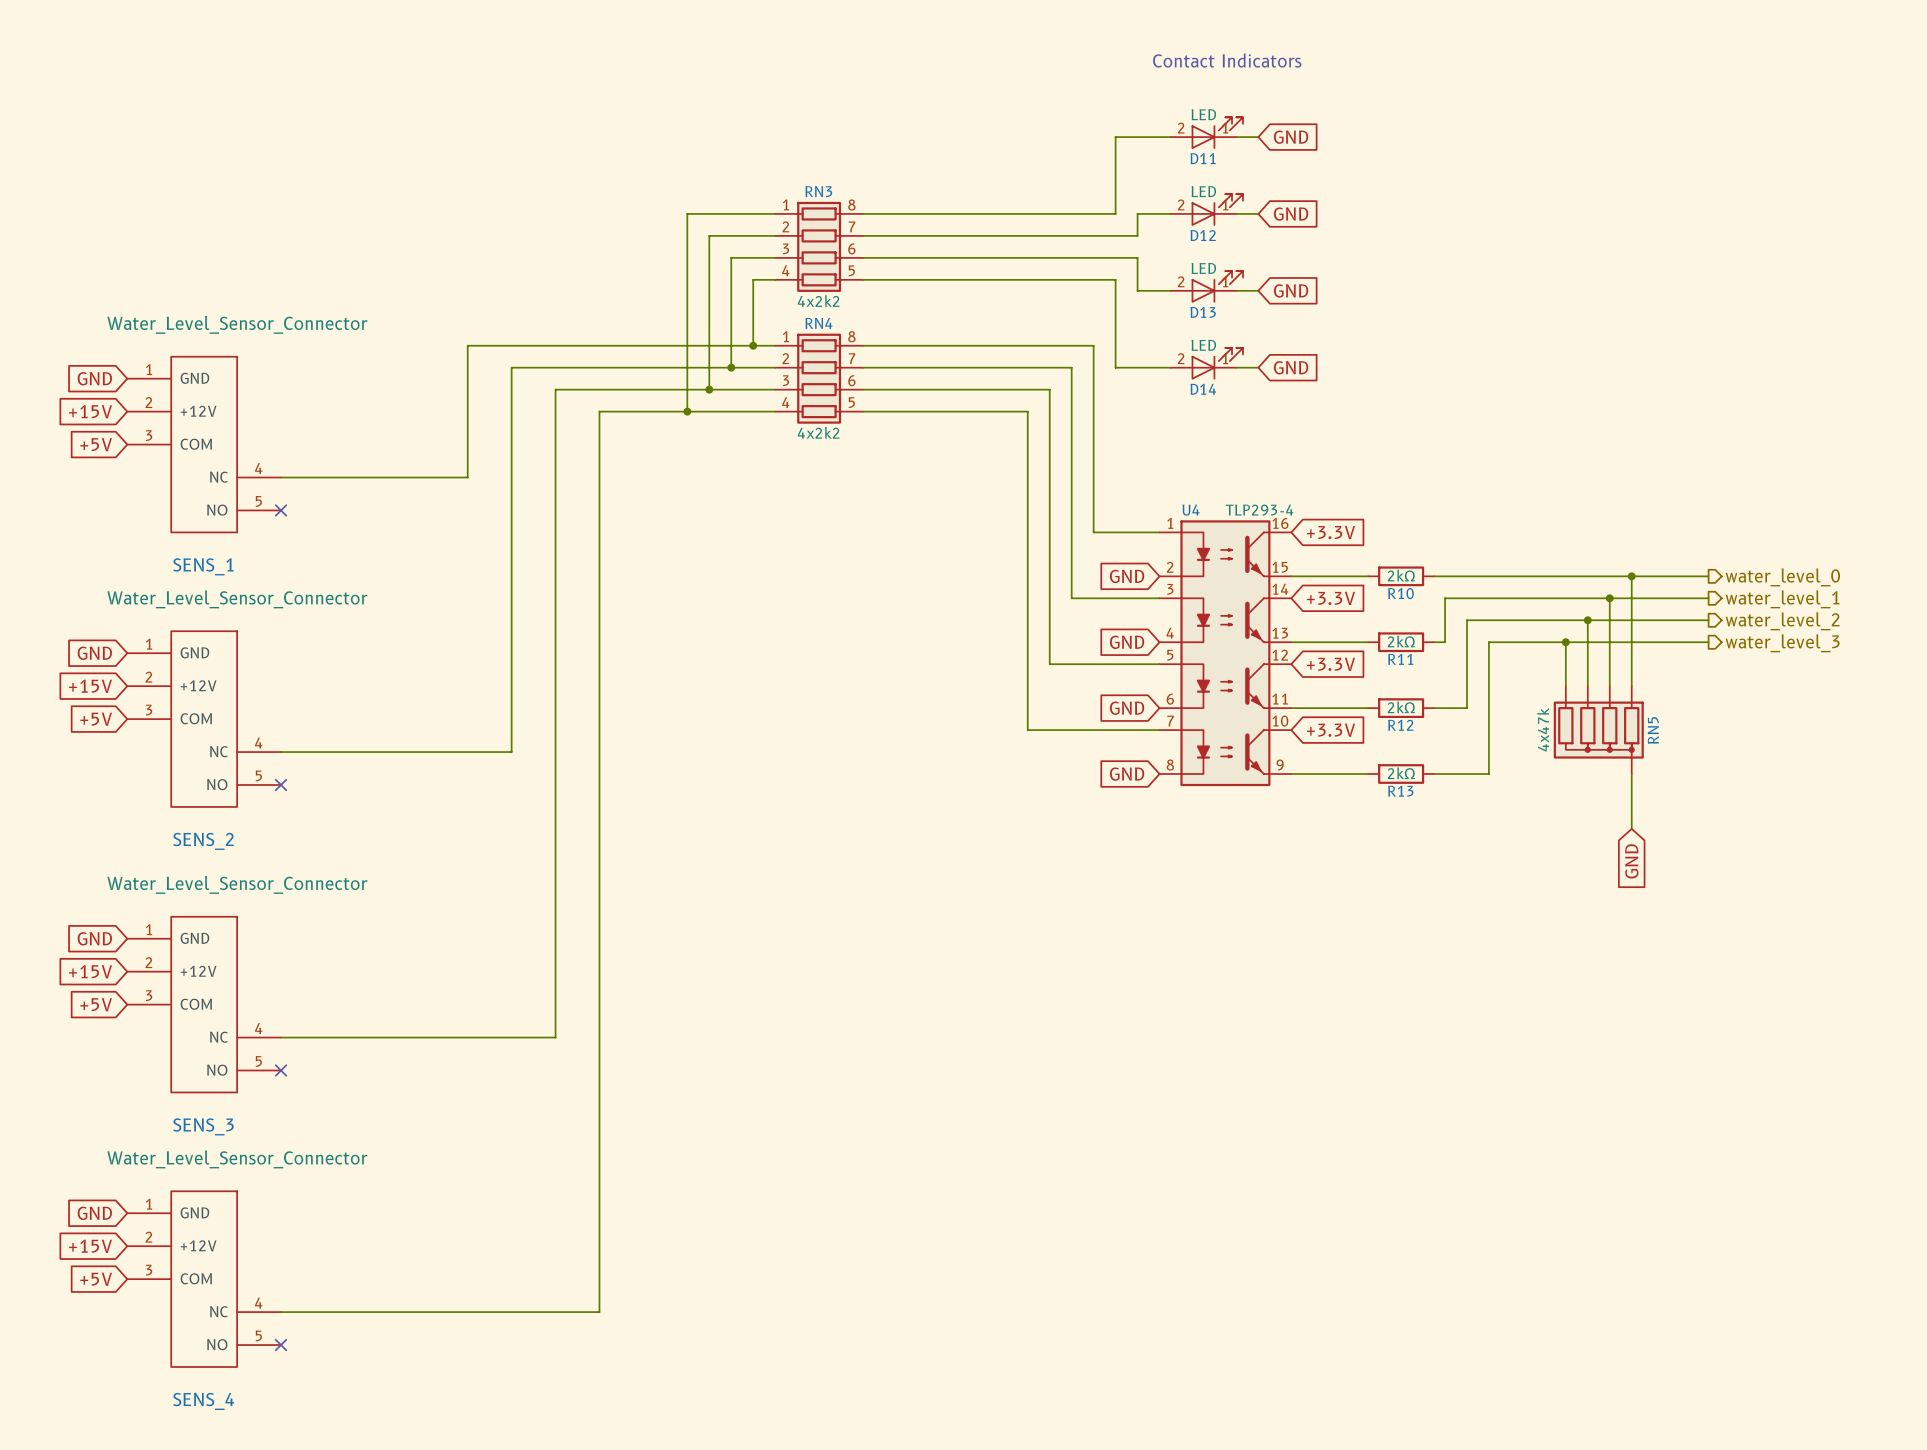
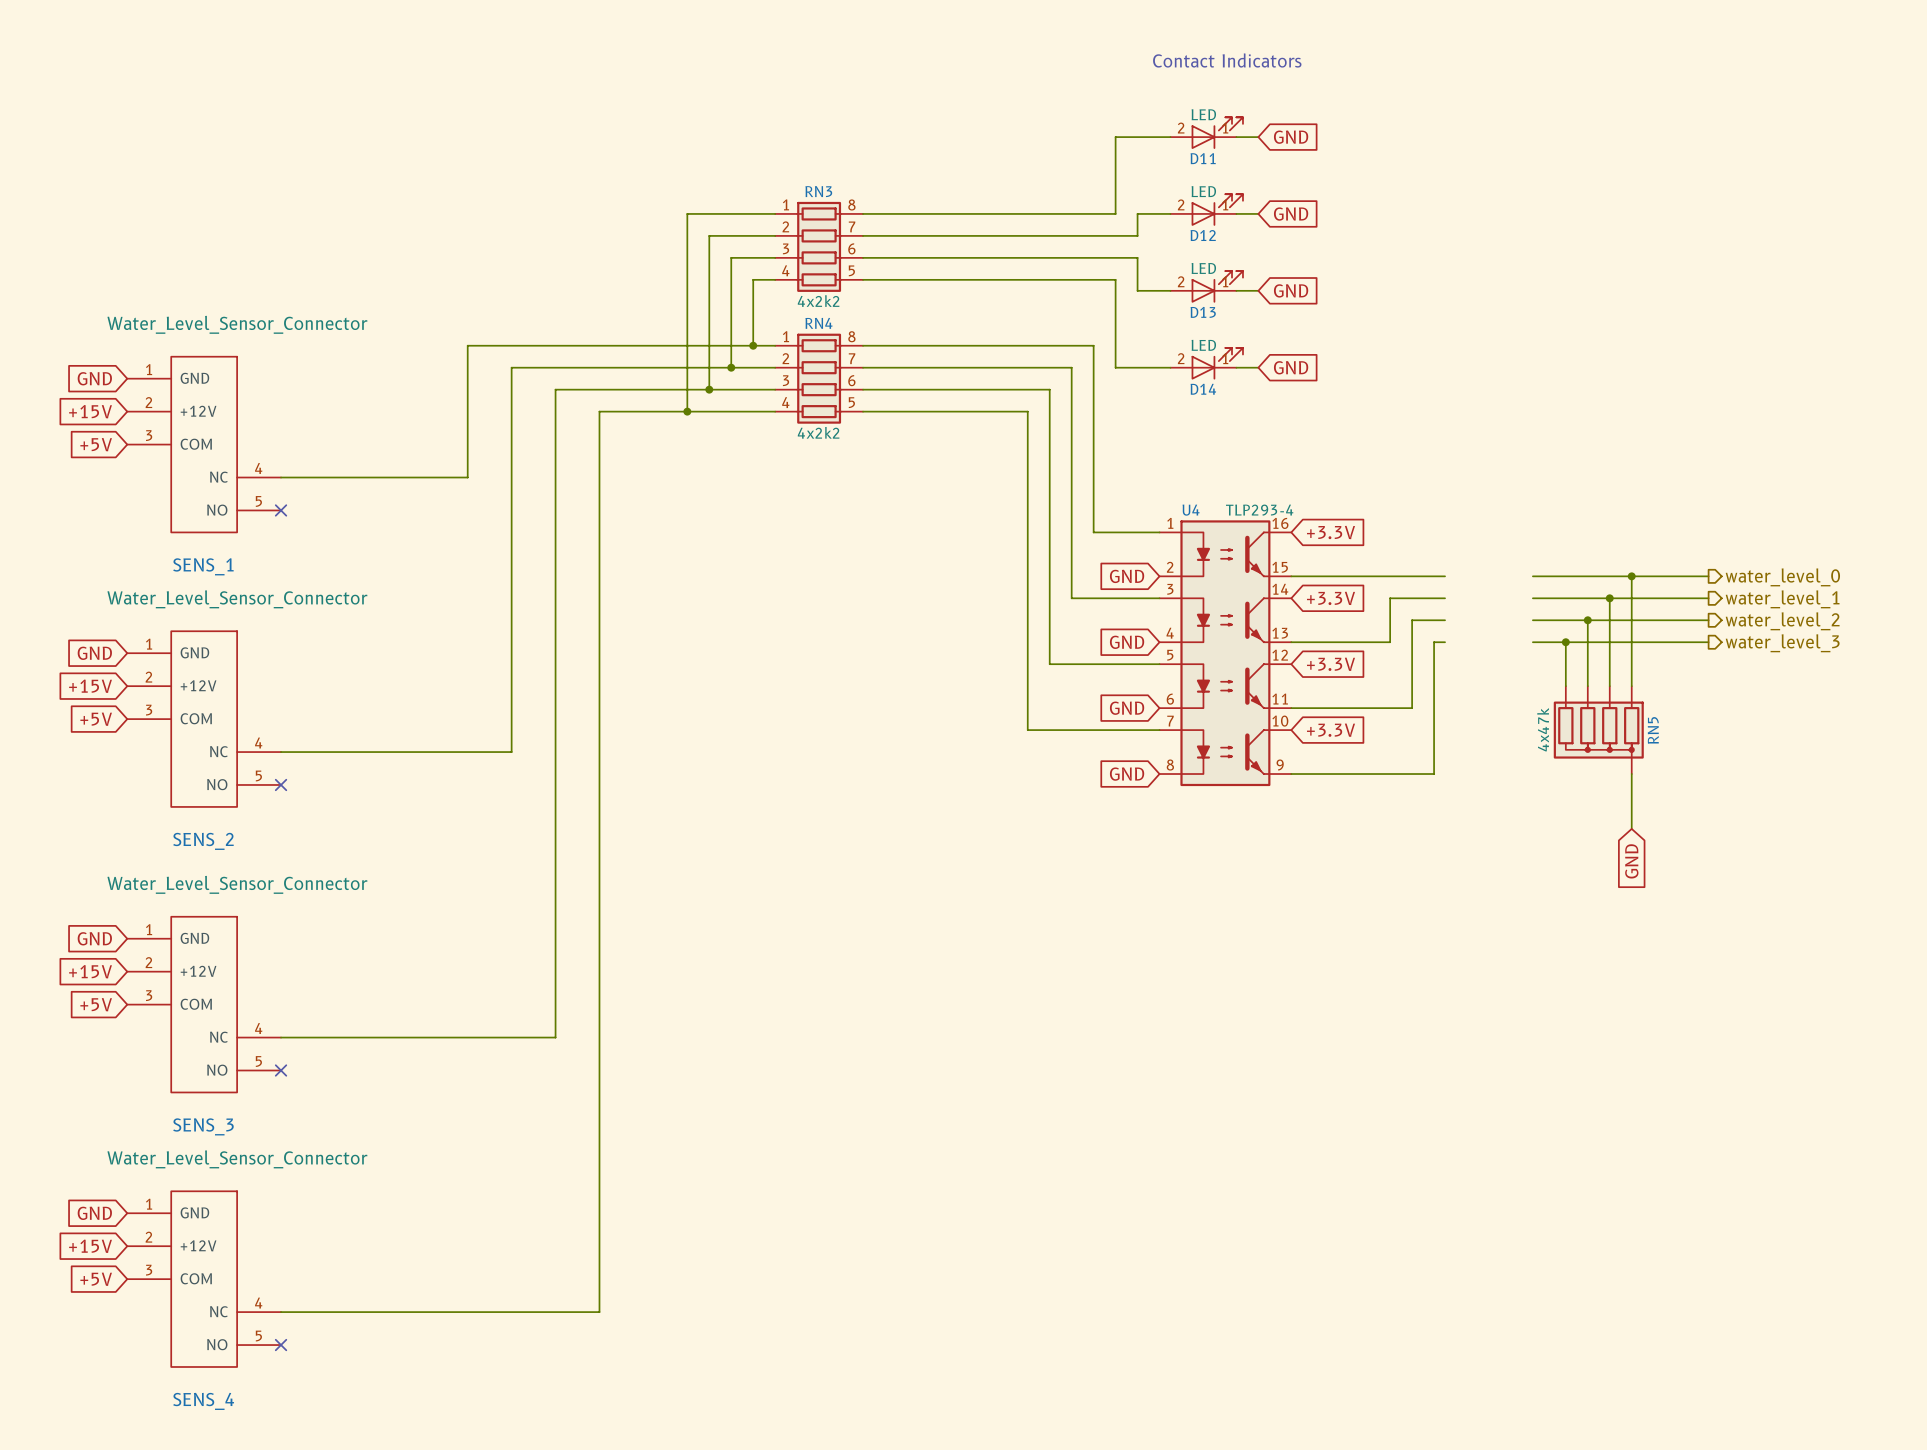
wire: none -> (1368, 576) (1434, 576)
R10: 2kΩ (1401, 576) -> none
wire: (1445, 576) (1532, 576) -> none
wire: none -> (1445, 598) (1390, 598) (1390, 642) (1368, 642)
wire: (1532, 598) (1445, 598) (1445, 642) -> none
wire: none -> (1445, 620) (1412, 620) (1412, 708) (1368, 708)
wire: (1532, 620) (1467, 620) (1467, 708) (1434, 708) -> none
R11: 2kΩ (1401, 642) -> none
wire: none -> (1434, 642) (1434, 774) (1368, 774)
wire: (1532, 642) (1488, 642) (1488, 774) (1434, 774) -> none
R12: 2kΩ (1401, 708) -> none
R13: 2kΩ (1401, 774) -> none

